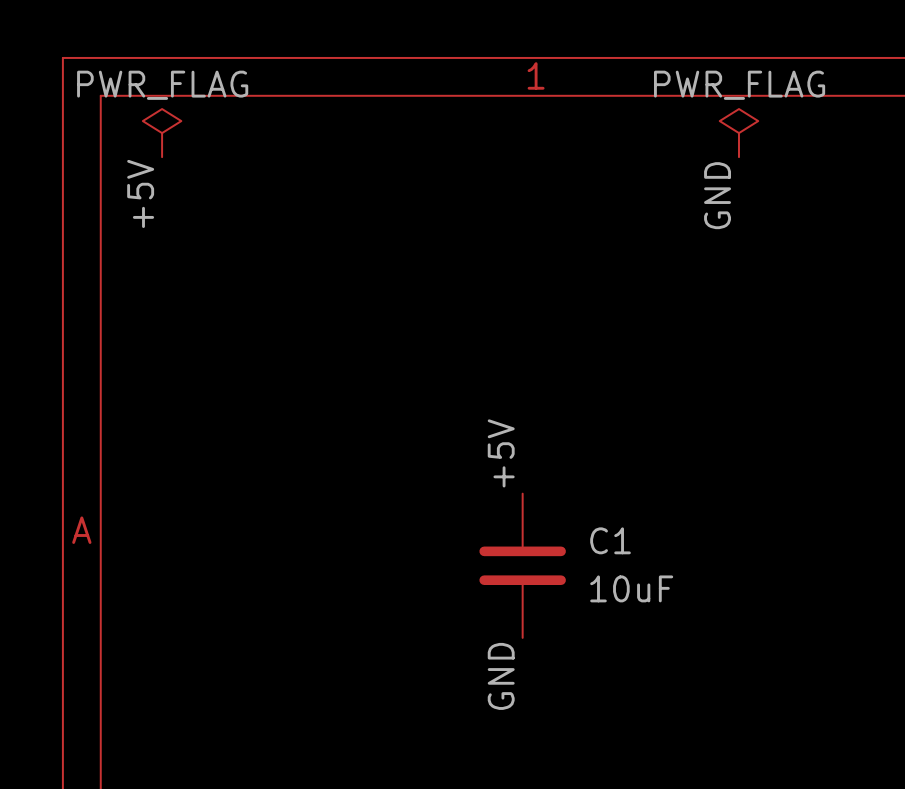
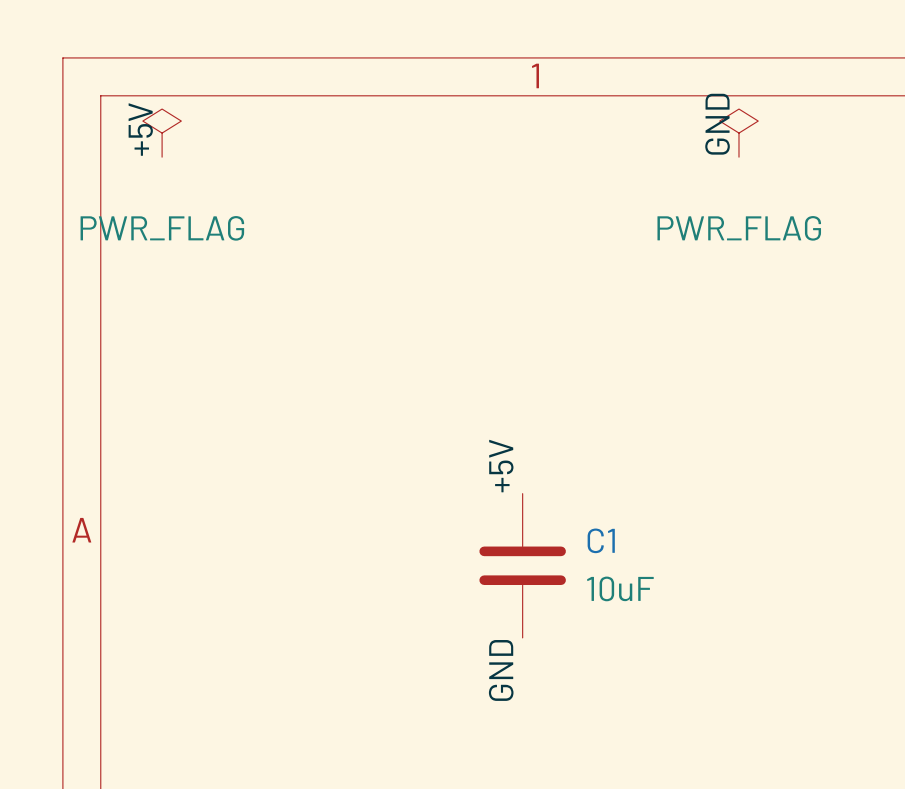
power symbol text position: PWR_FLAG (162, 85) -> PWR_FLAG (162, 228)
power symbol text position: PWR_FLAG (739, 85) -> PWR_FLAG (739, 228)
label position: +5V (140, 193) -> +5V (140, 129)
label position: GND (717, 195) -> GND (717, 124)

